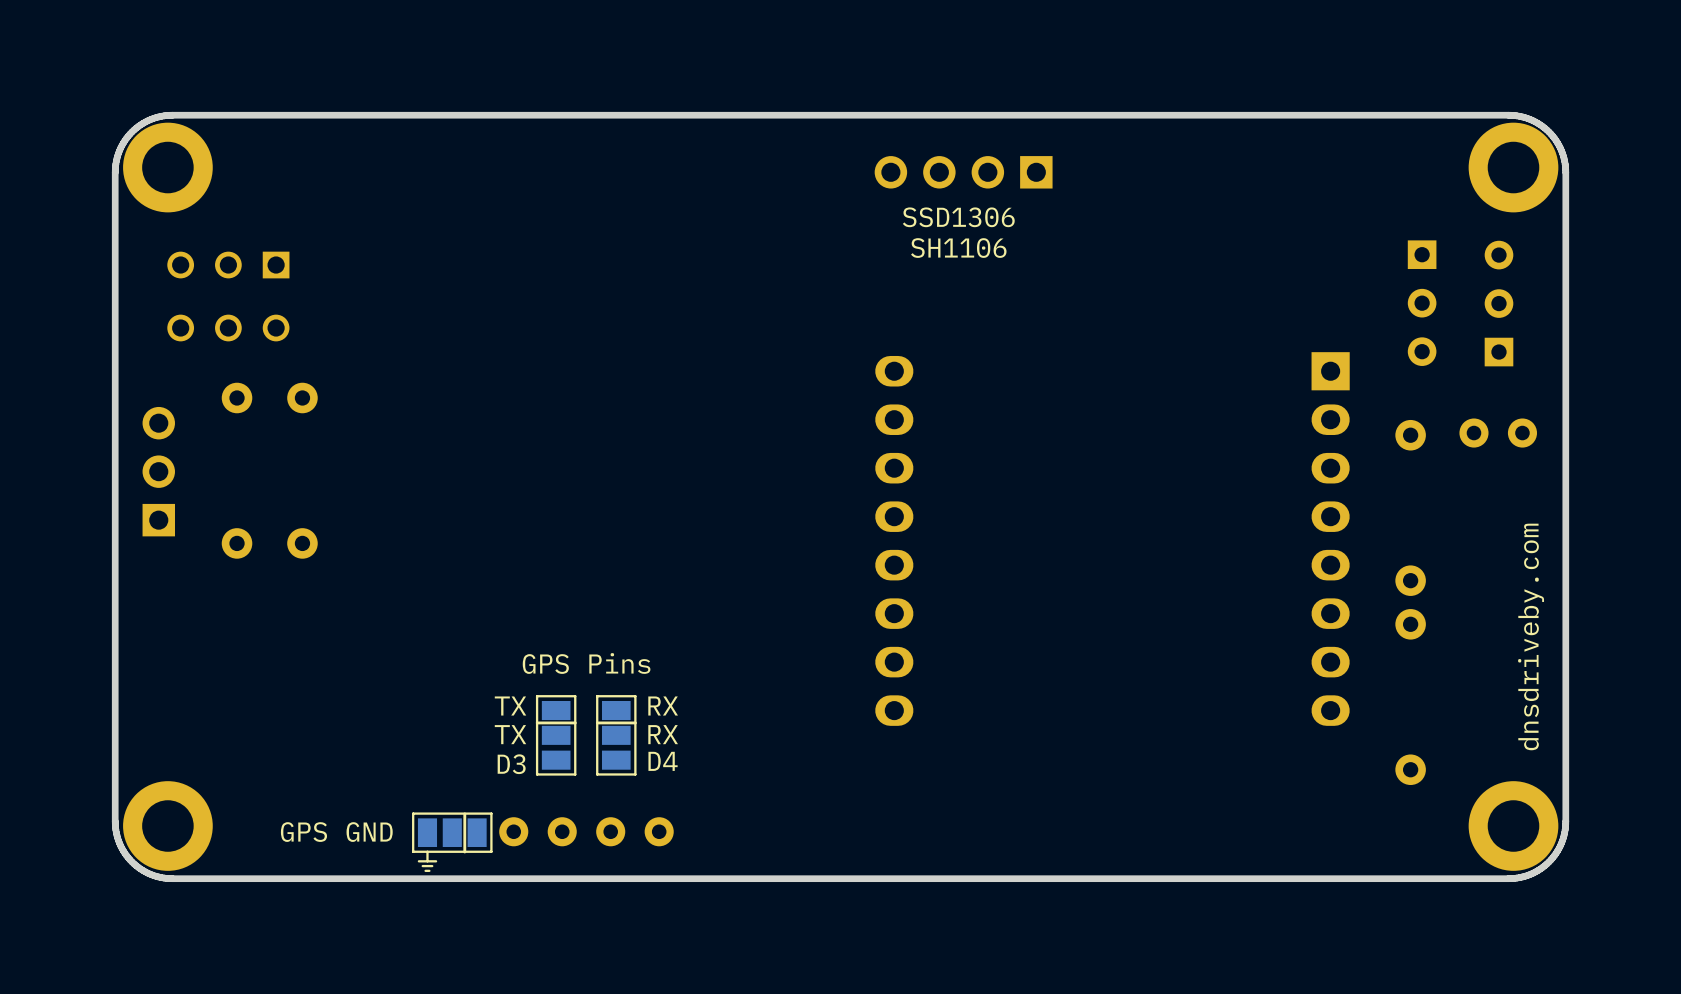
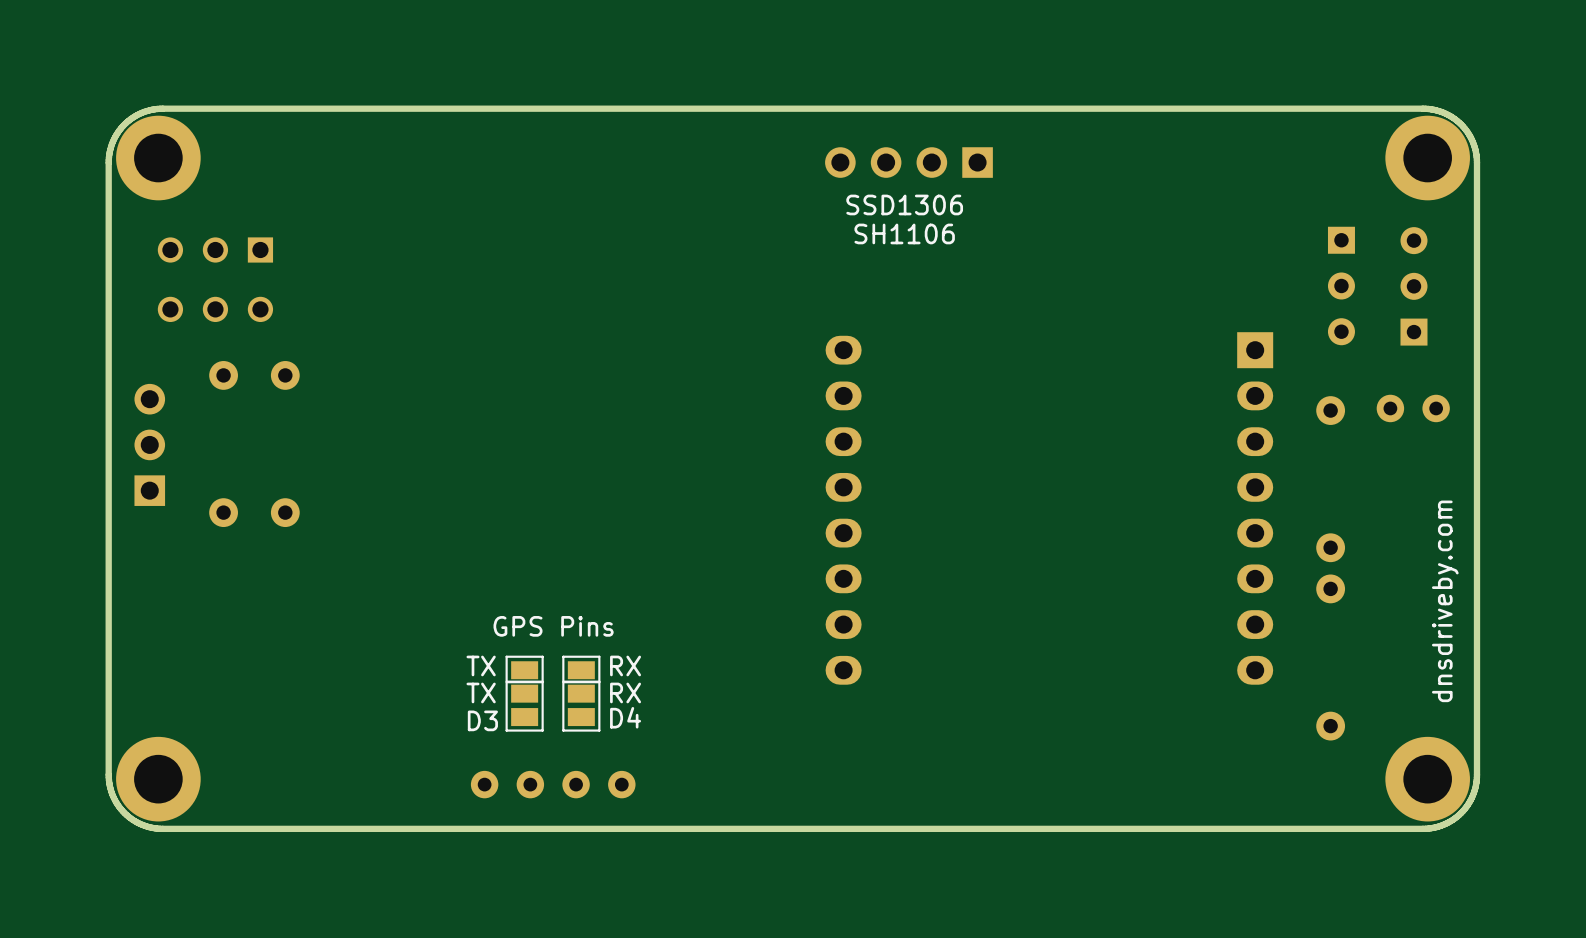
line: (464, 813) (464, 852) -> none
GPS GND: (452, 842) -> none

